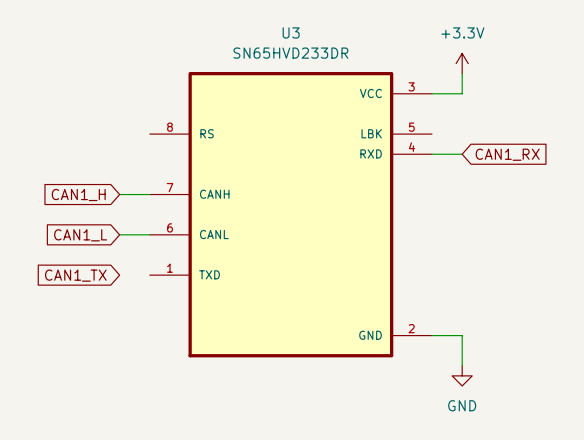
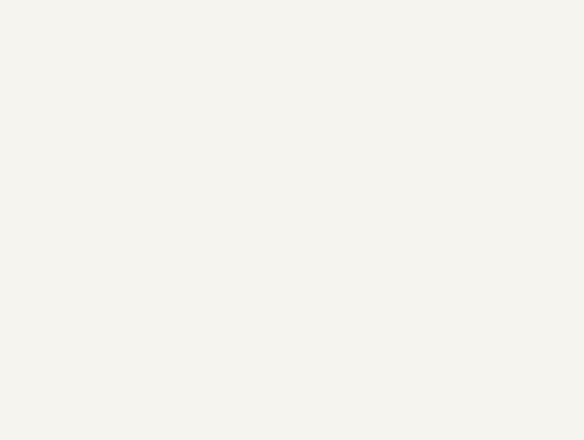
power symbol: +3.3V (462, 63) -> none
wire: (462, 73) (462, 93) (431, 93) -> none
wire: (431, 154) (462, 154) -> none
global label: CAN1_RX (507, 154) -> none
wire: (119, 194) (149, 194) -> none
global label: CAN1_H (78, 195) -> none
U3: SN65HVD233DR (290, 214) -> none
wire: (119, 234) (149, 234) -> none
global label: CAN1_L (80, 235) -> none
global label: CAN1_TX (75, 275) -> none
wire: (431, 335) (462, 335) (462, 365) -> none
power symbol: GND (462, 375) -> none

